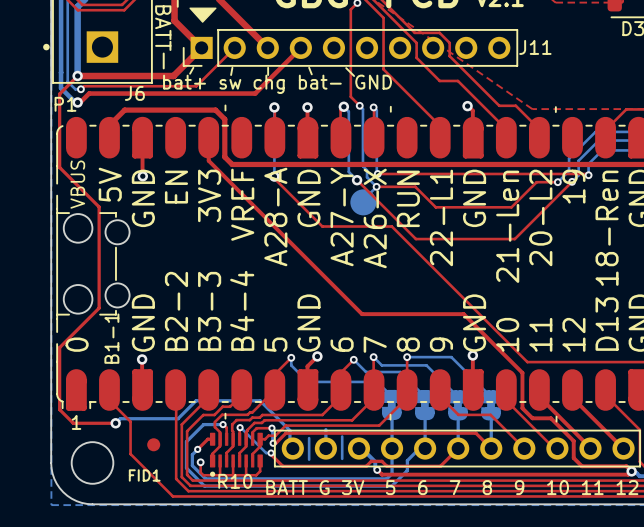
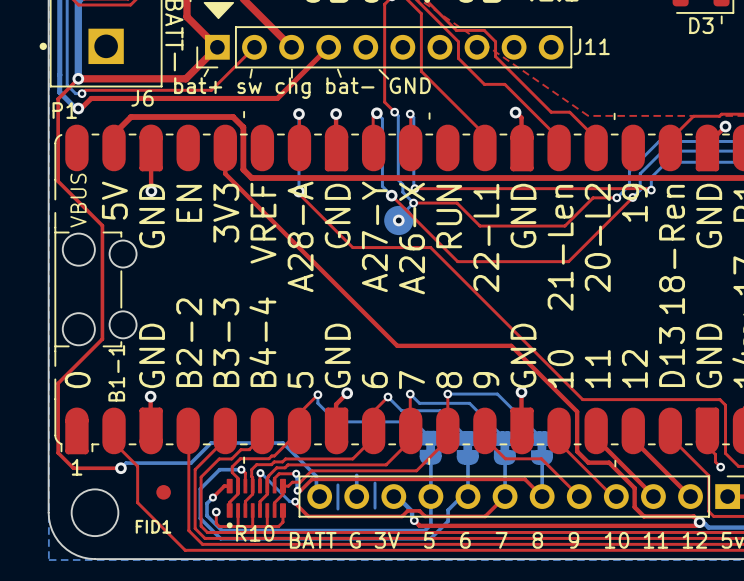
via: none -> (398, 220)

